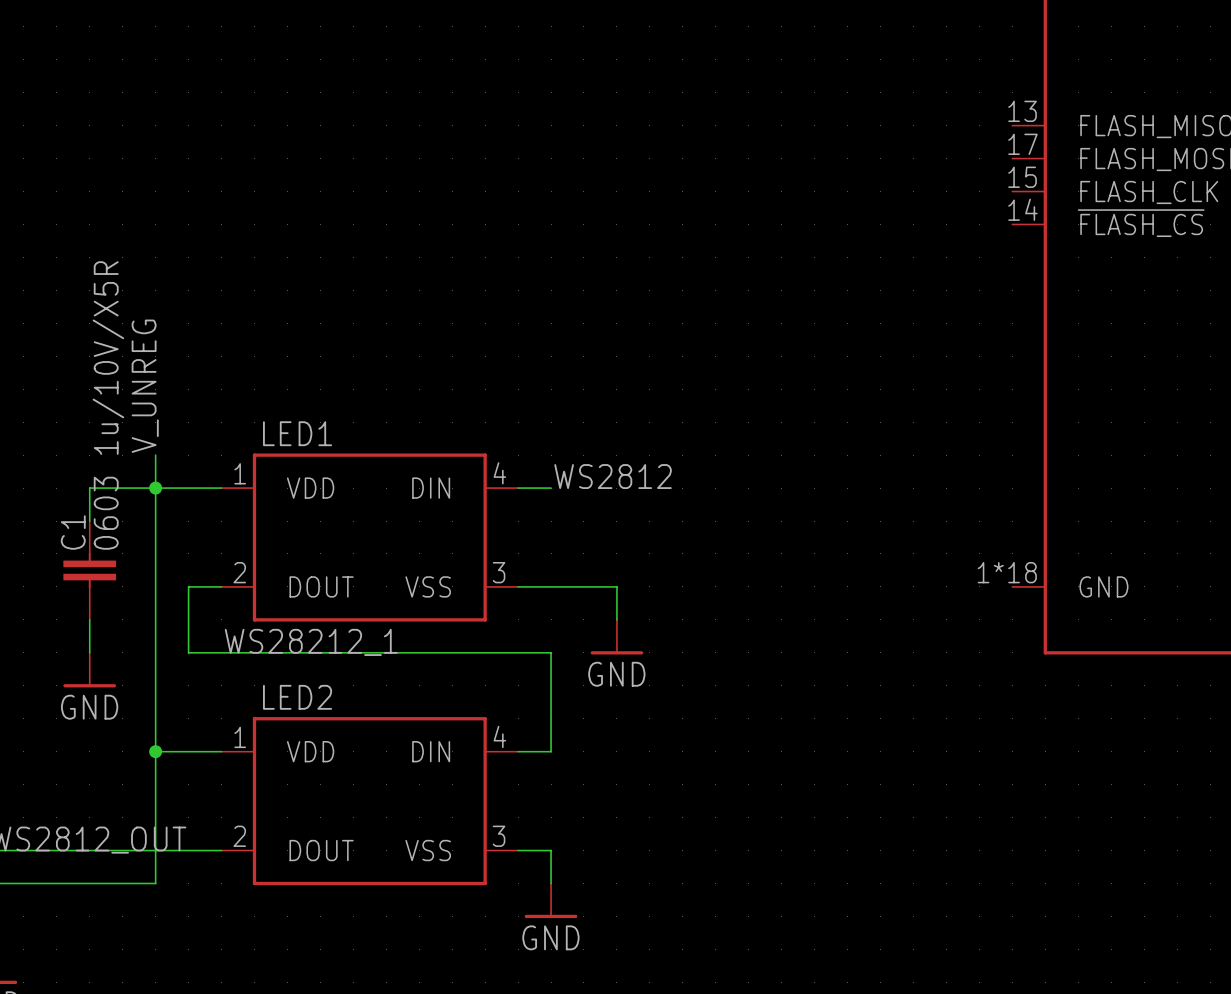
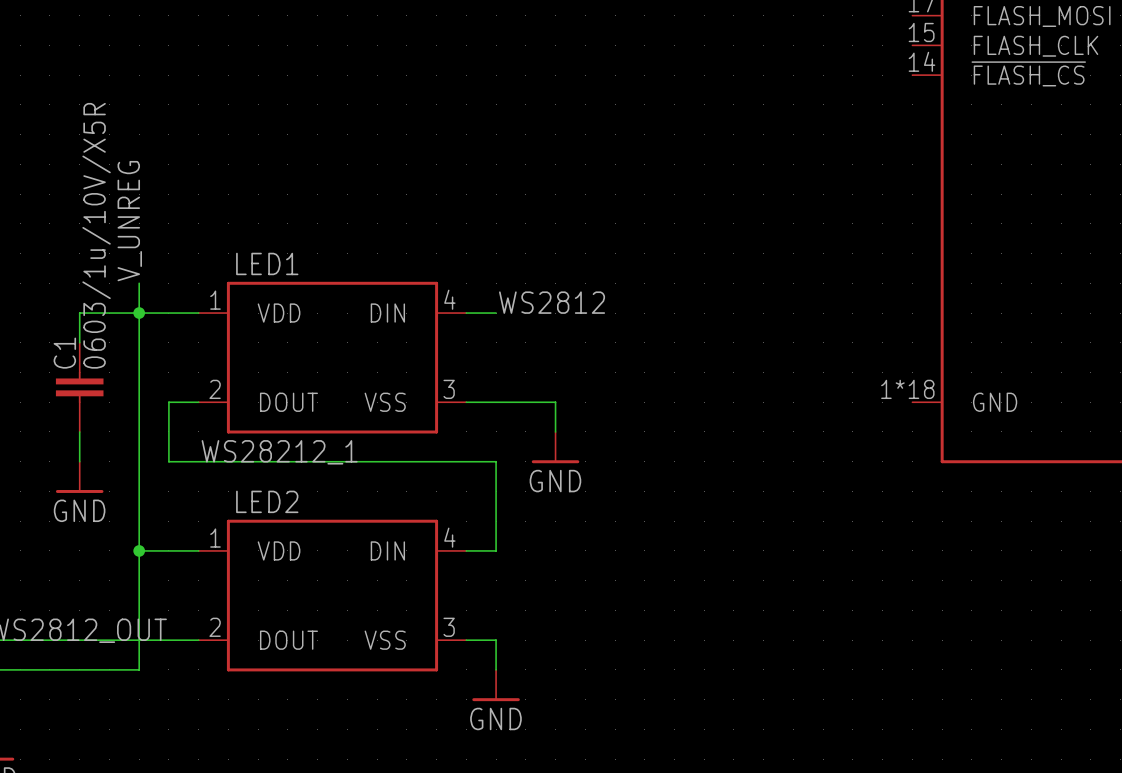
C1 value: 0603 1u/10V/X5R (108, 405) -> 0603/1u/10V/X5R (96, 235)

